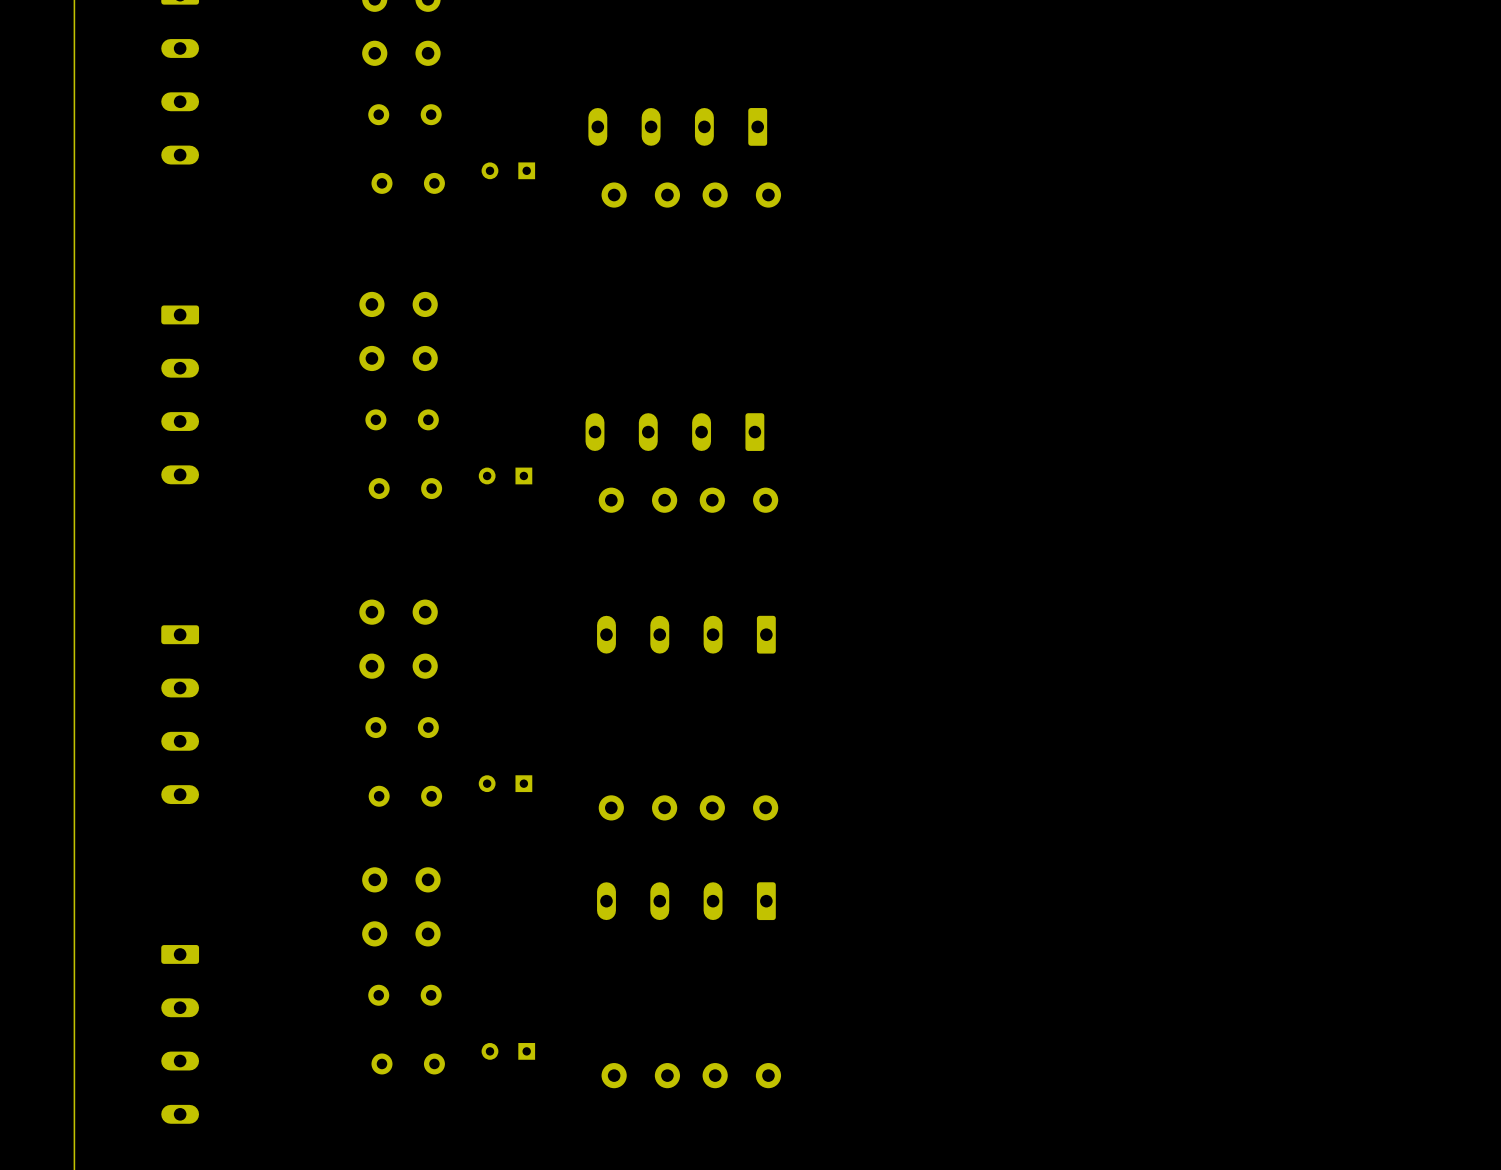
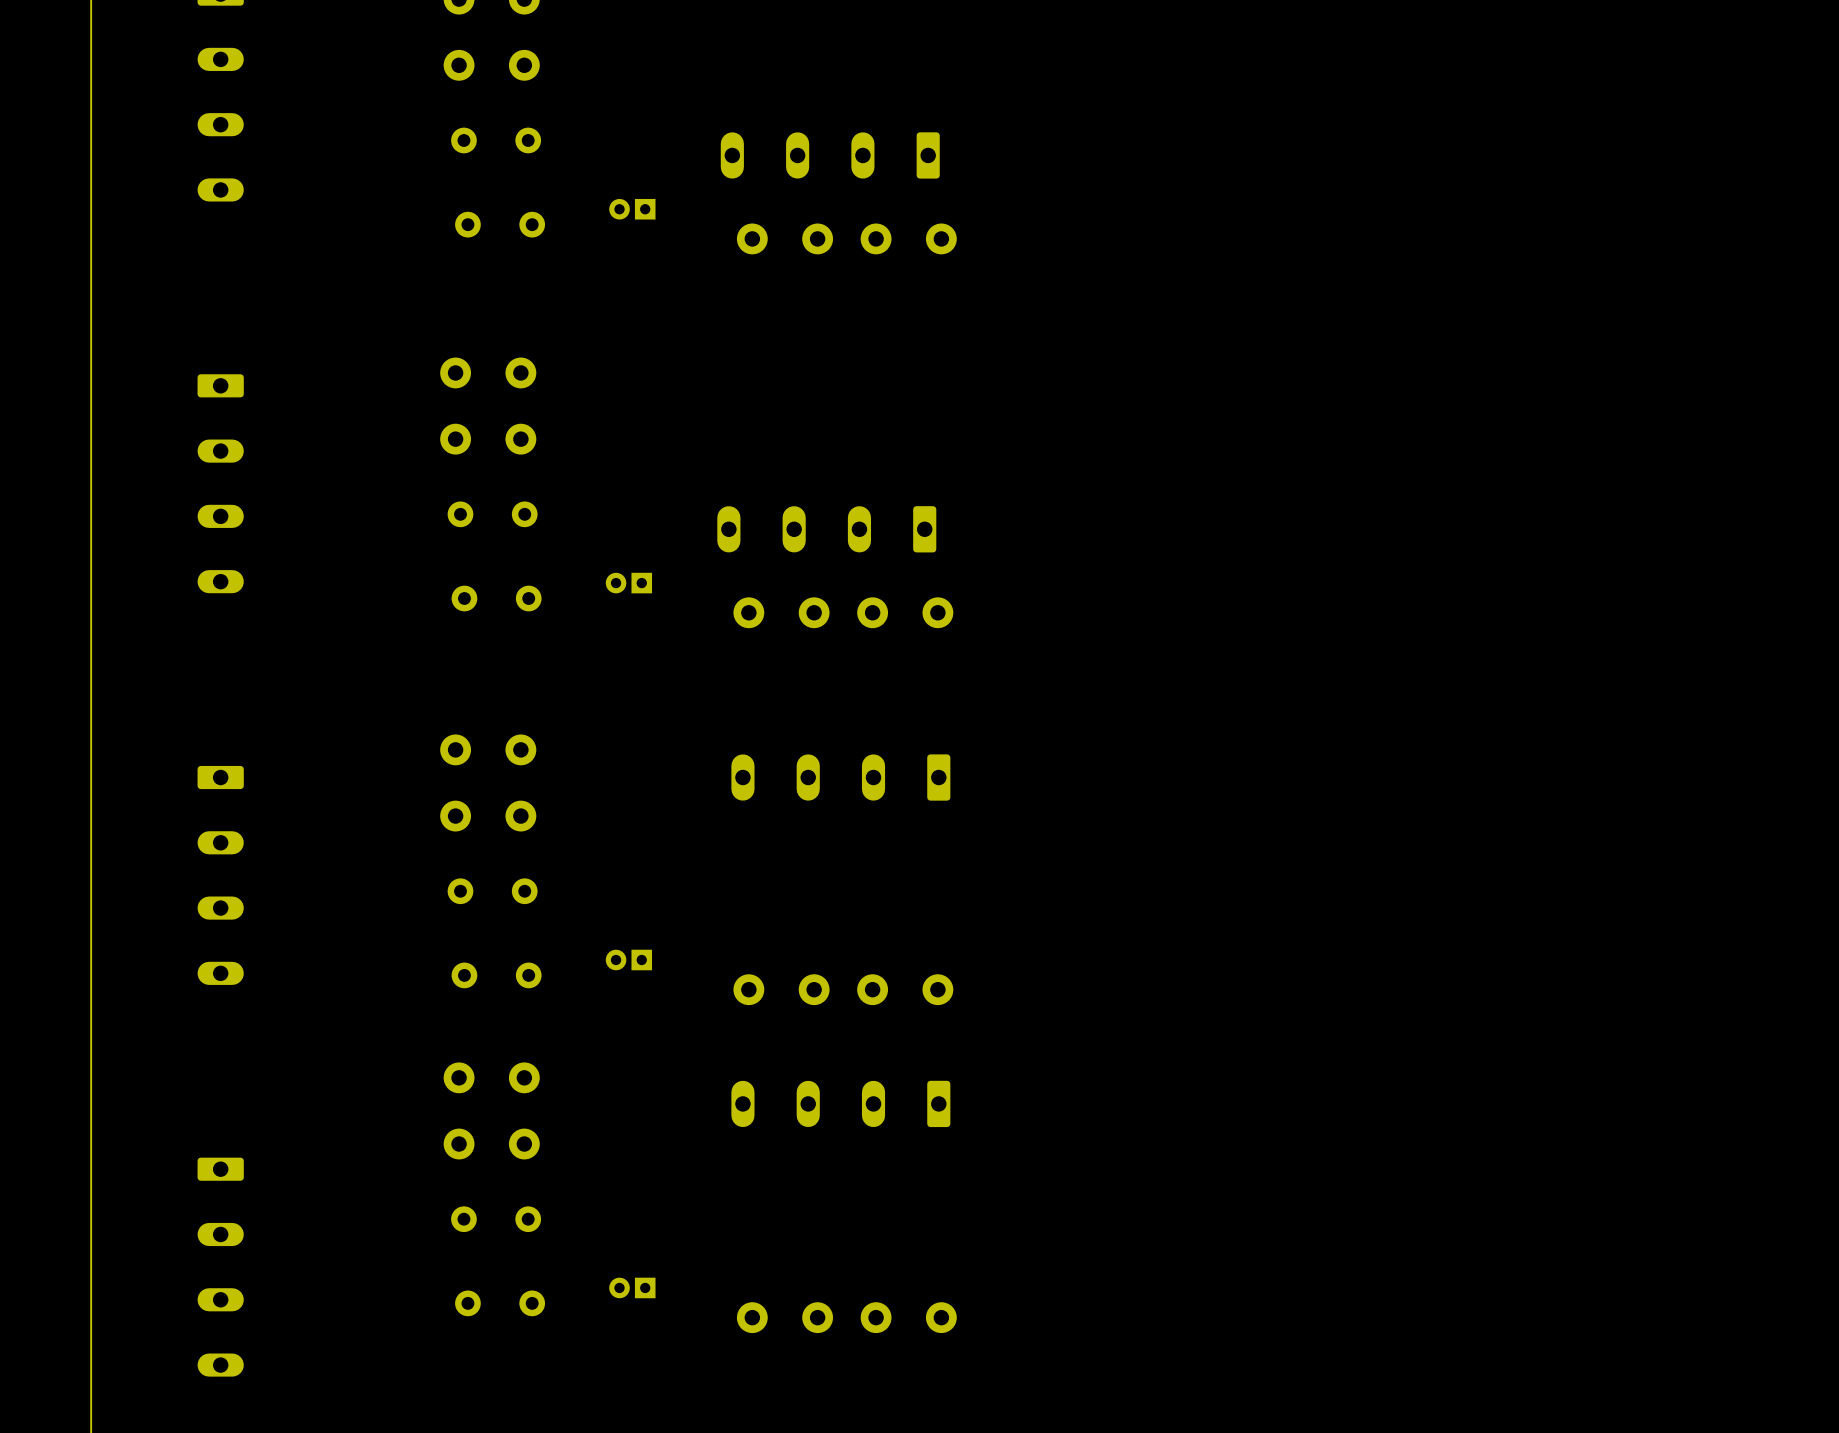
part footprint: [481, 162, 536, 180] -> [609, 198, 656, 220]
part footprint: [478, 467, 533, 485] -> [605, 572, 653, 594]
part footprint: [478, 775, 533, 793] -> [605, 949, 653, 971]
part footprint: [481, 1042, 536, 1060] -> [609, 1277, 656, 1299]

